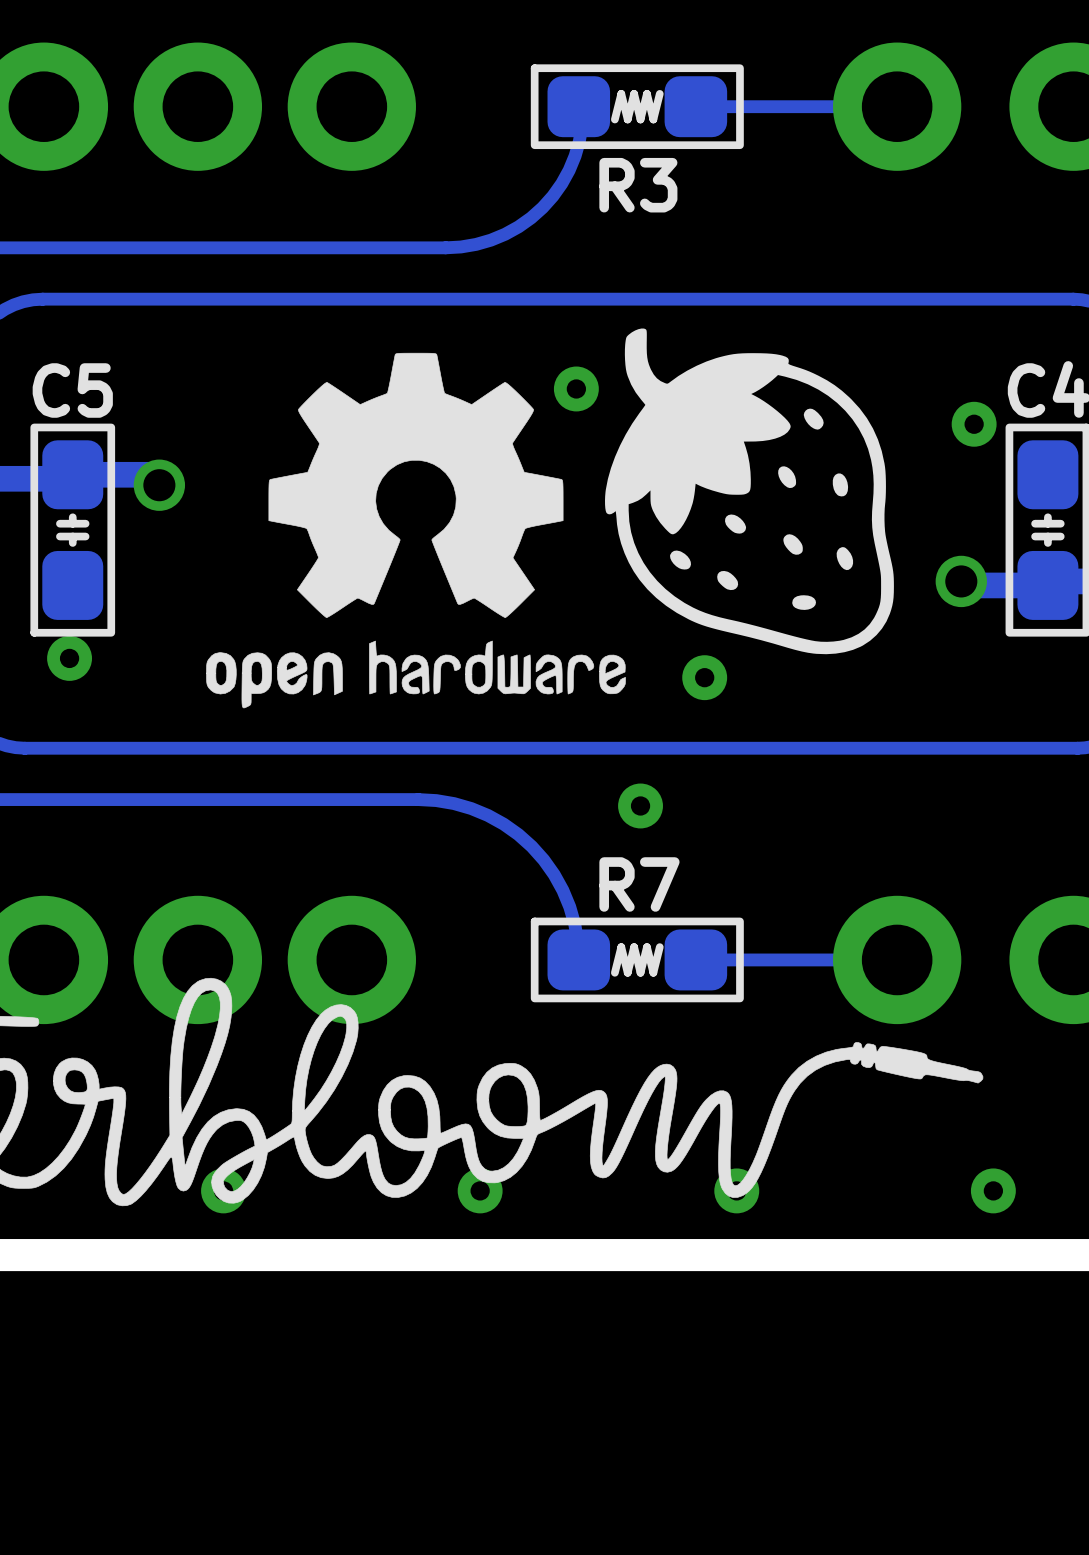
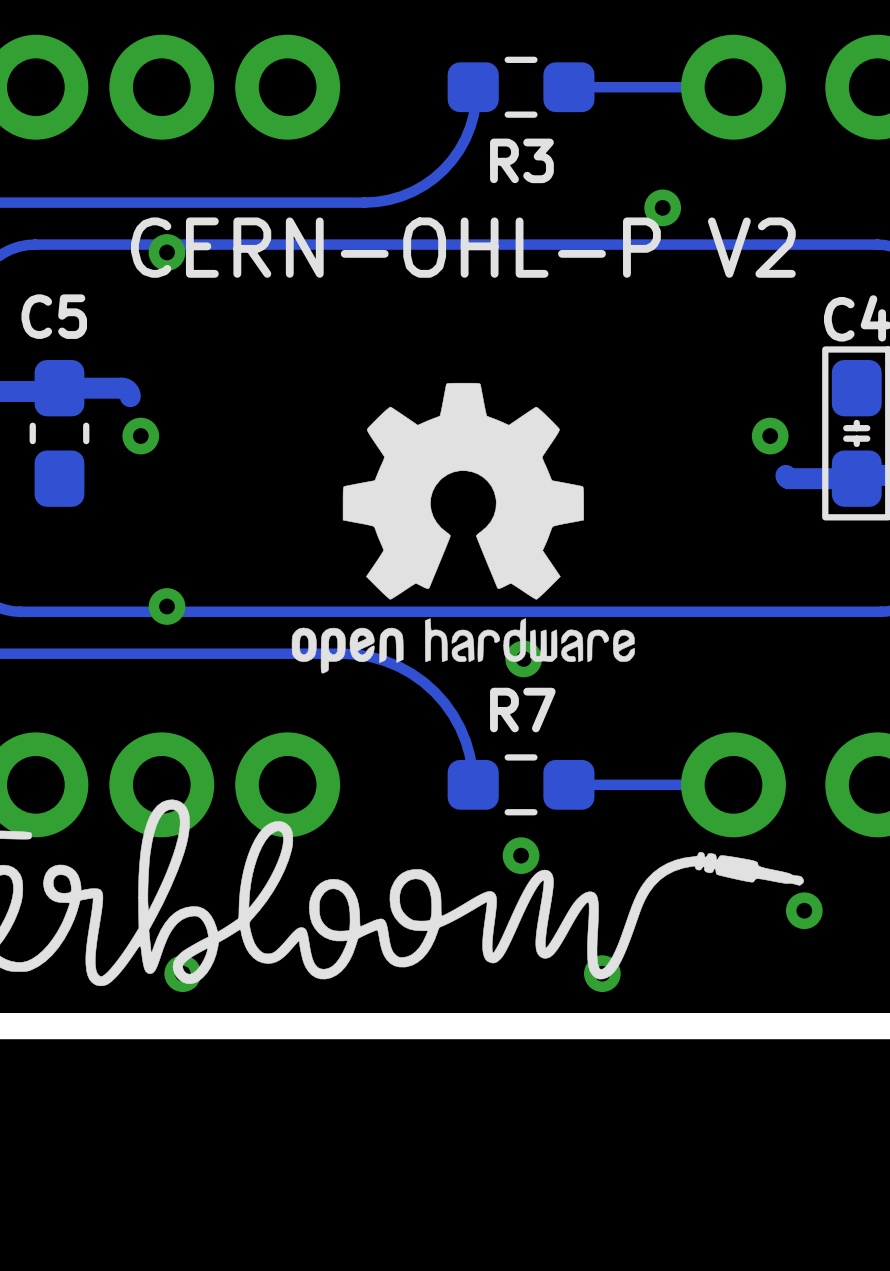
R3 footprint: [530, 64, 744, 150] -> [447, 56, 595, 118]
via: none -> (662, 207)
text: none -> CERN-OHL-P V2 (463, 247)
via: none -> (167, 252)
drawing: [605, 328, 894, 655] -> none
via: (576, 388) -> none
C5 footprint: [30, 423, 116, 637] -> [29, 359, 90, 507]
via position: (974, 424) -> (770, 436)
via position: (159, 485) -> (140, 436)
drawing position: (415, 530) -> (463, 528)
via: (961, 581) -> none
via: (69, 658) -> none
via: (704, 677) -> none
via: none -> (167, 606)
R7 footprint: [530, 917, 744, 1003] -> [447, 754, 595, 816]
via: none -> (521, 855)
via: (480, 1190) -> none
via position: (993, 1190) -> (804, 910)

